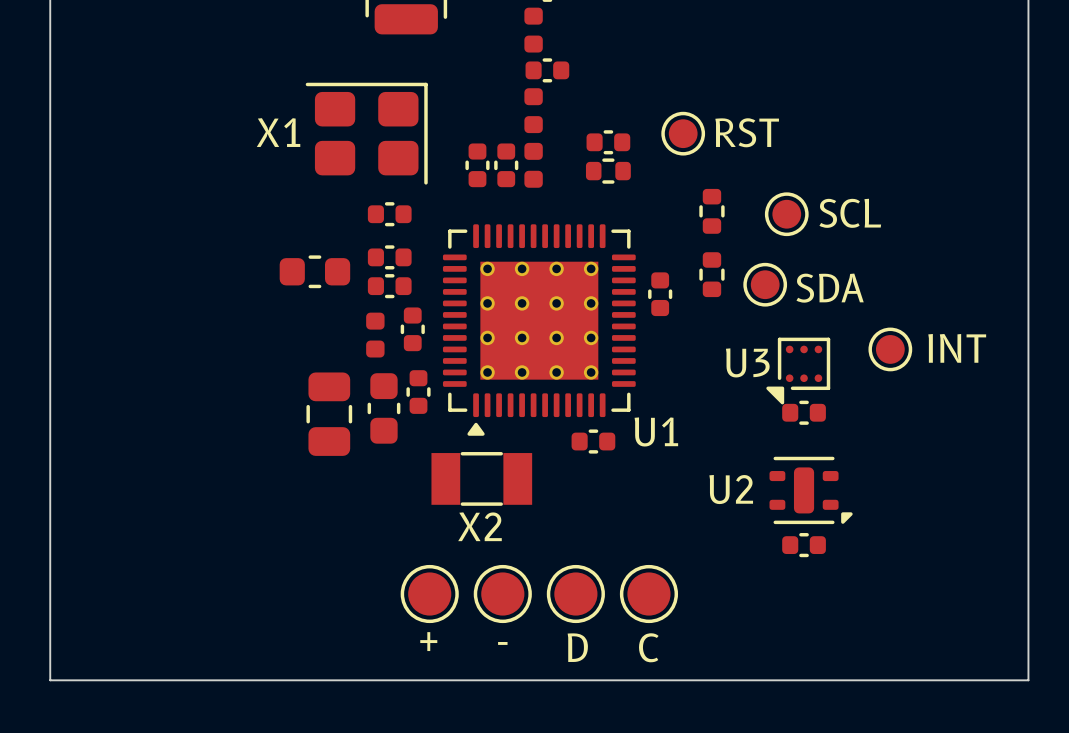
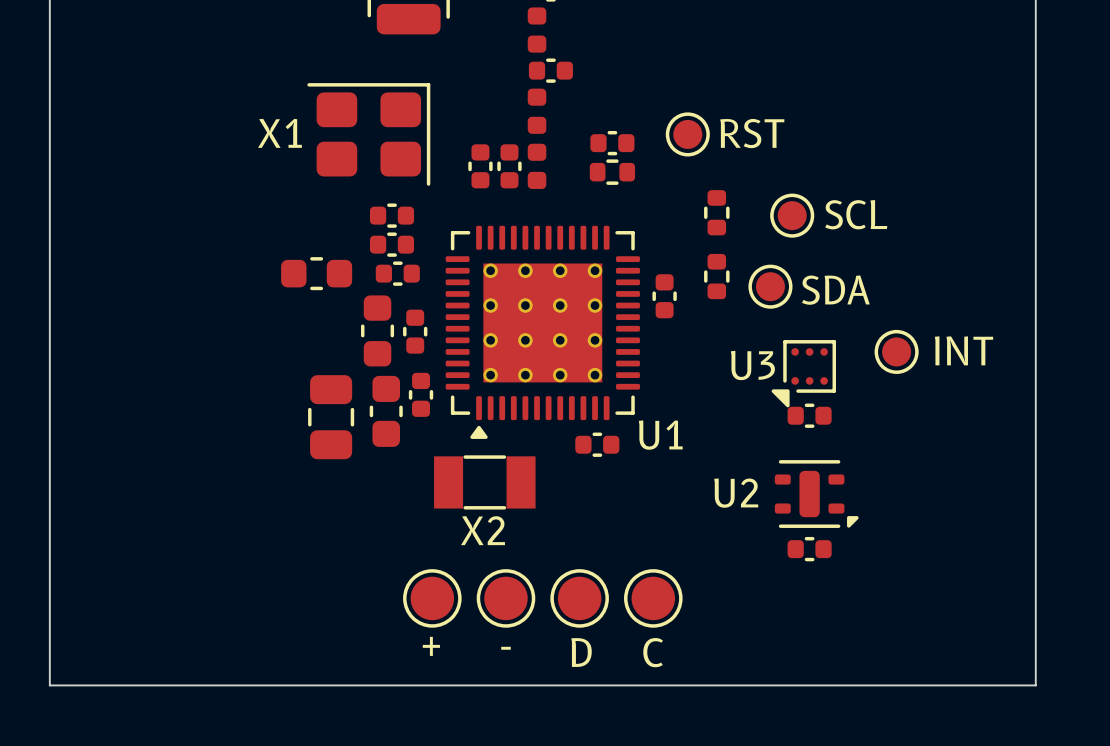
part: none -> (392, 244)
part: (389, 257) -> none
part: none -> (397, 273)
part: (389, 286) -> none
part footprint: [366, 312, 385, 358] -> [360, 295, 395, 367]

